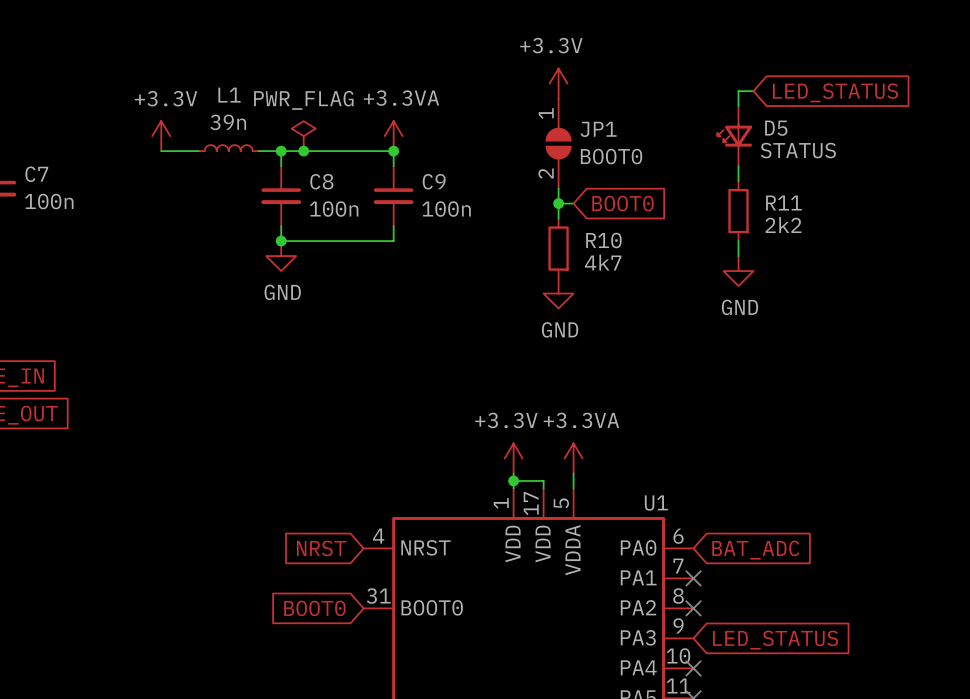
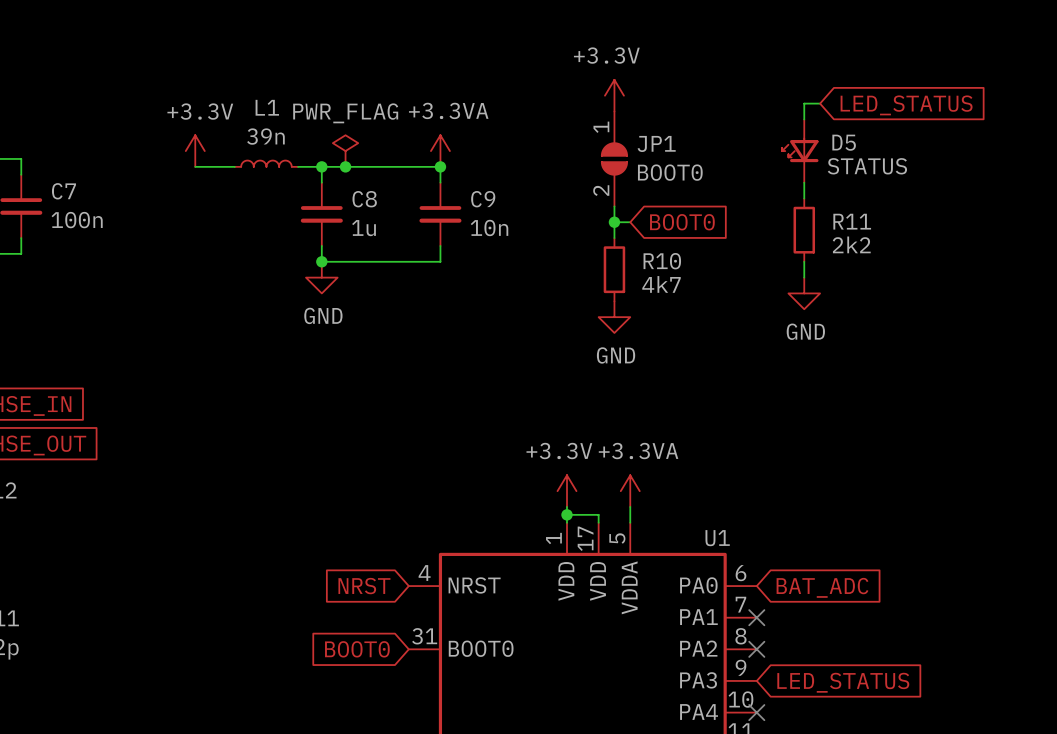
C8 value: 100n (334, 209) -> 1u (364, 228)
C9 value: 100n (446, 209) -> 10n (489, 227)

